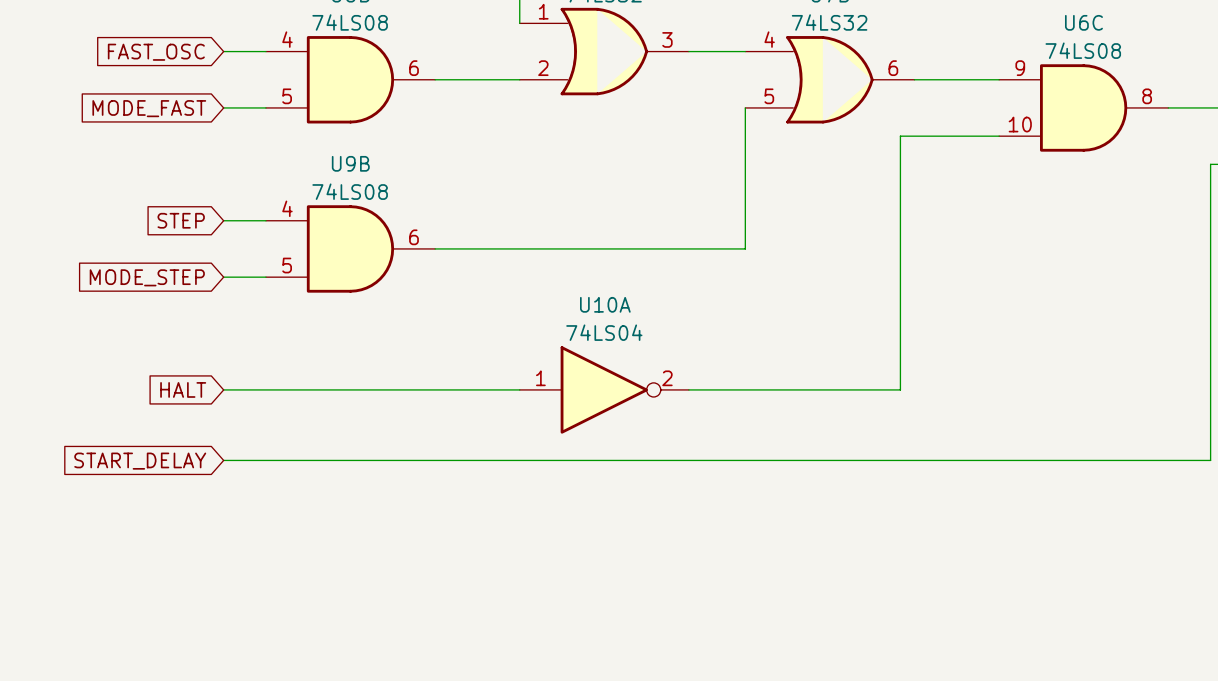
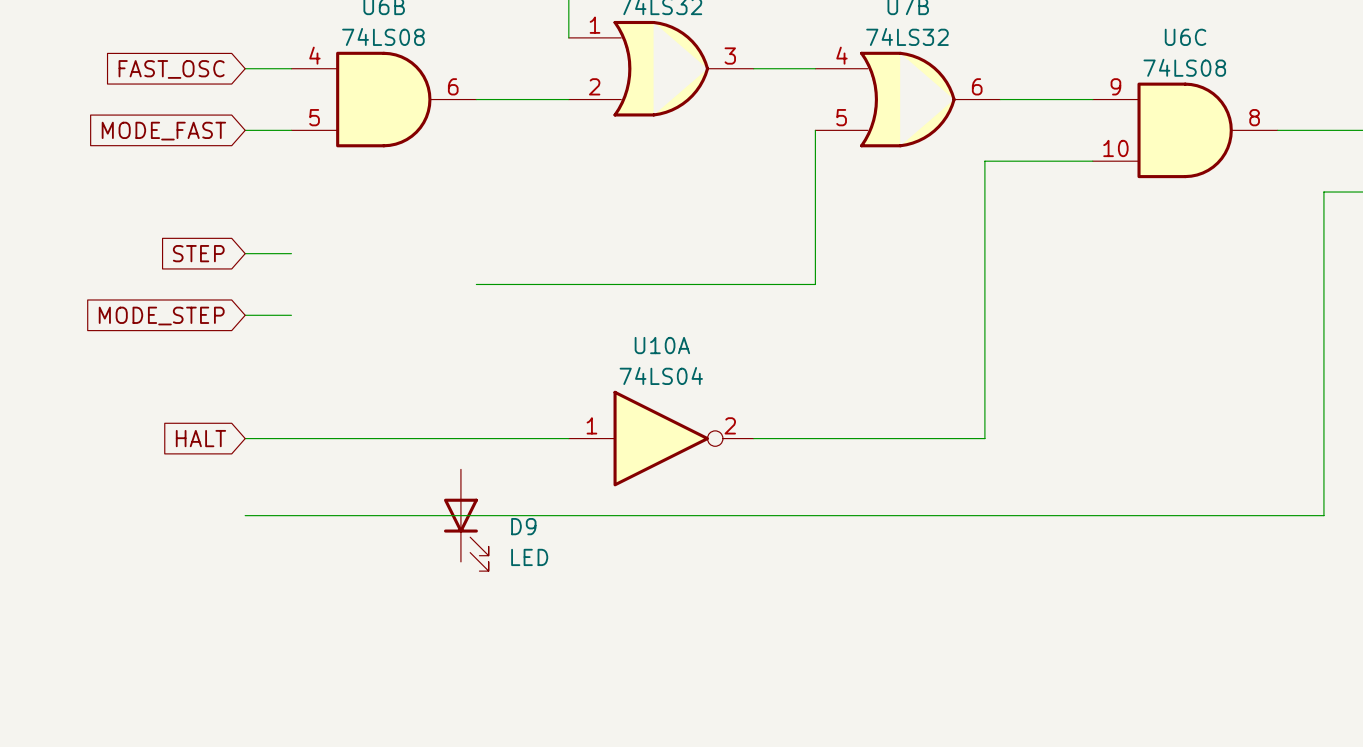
U9B: 74LS08 (350, 248) -> none
global label: START_DELAY (140, 461) -> none
D9: none -> LED (466, 520)

